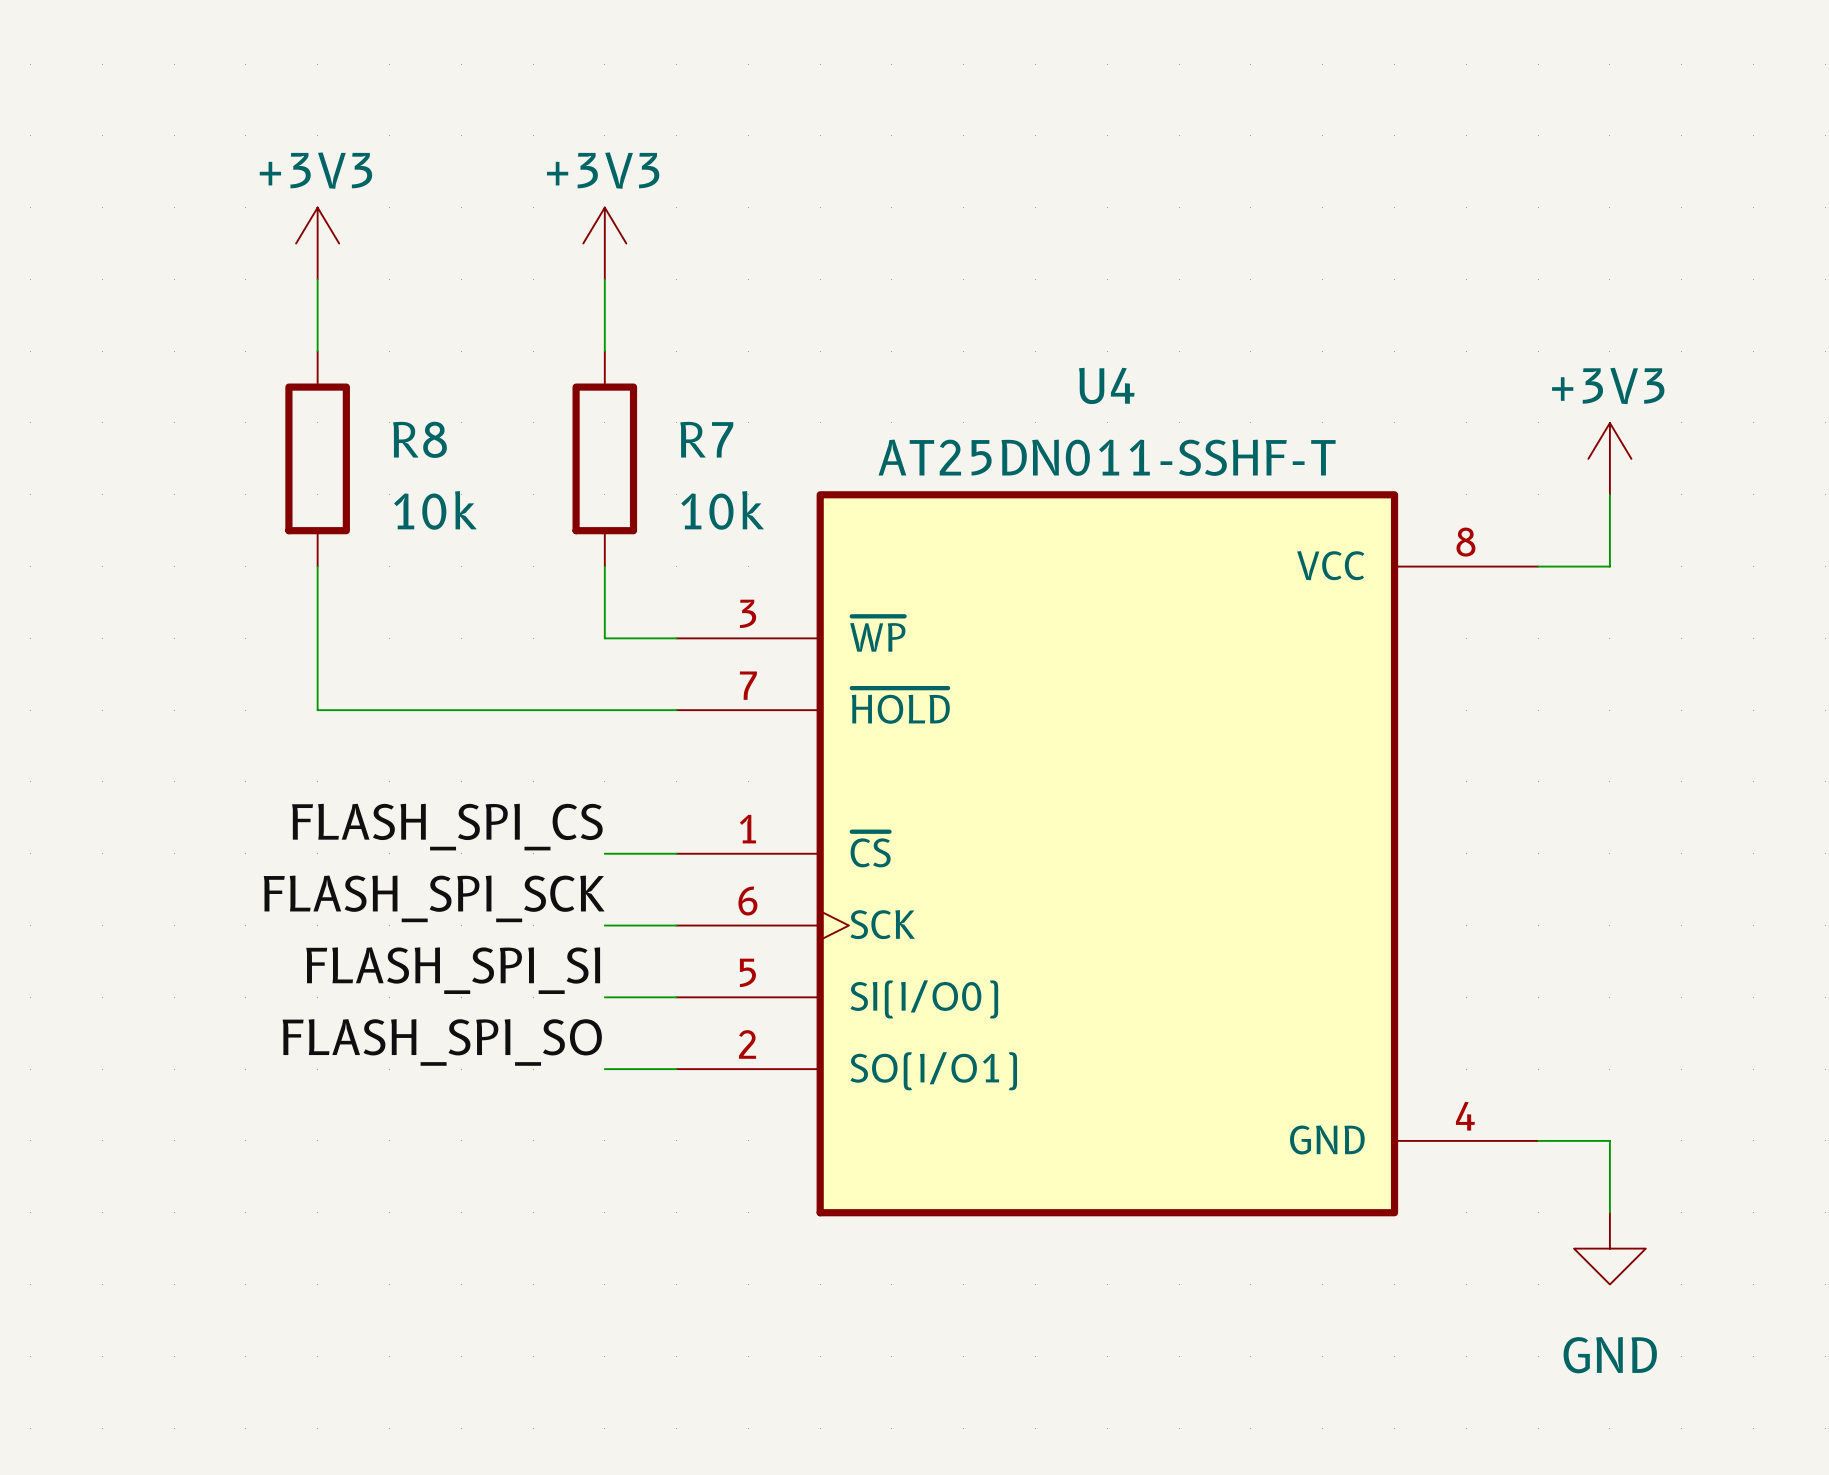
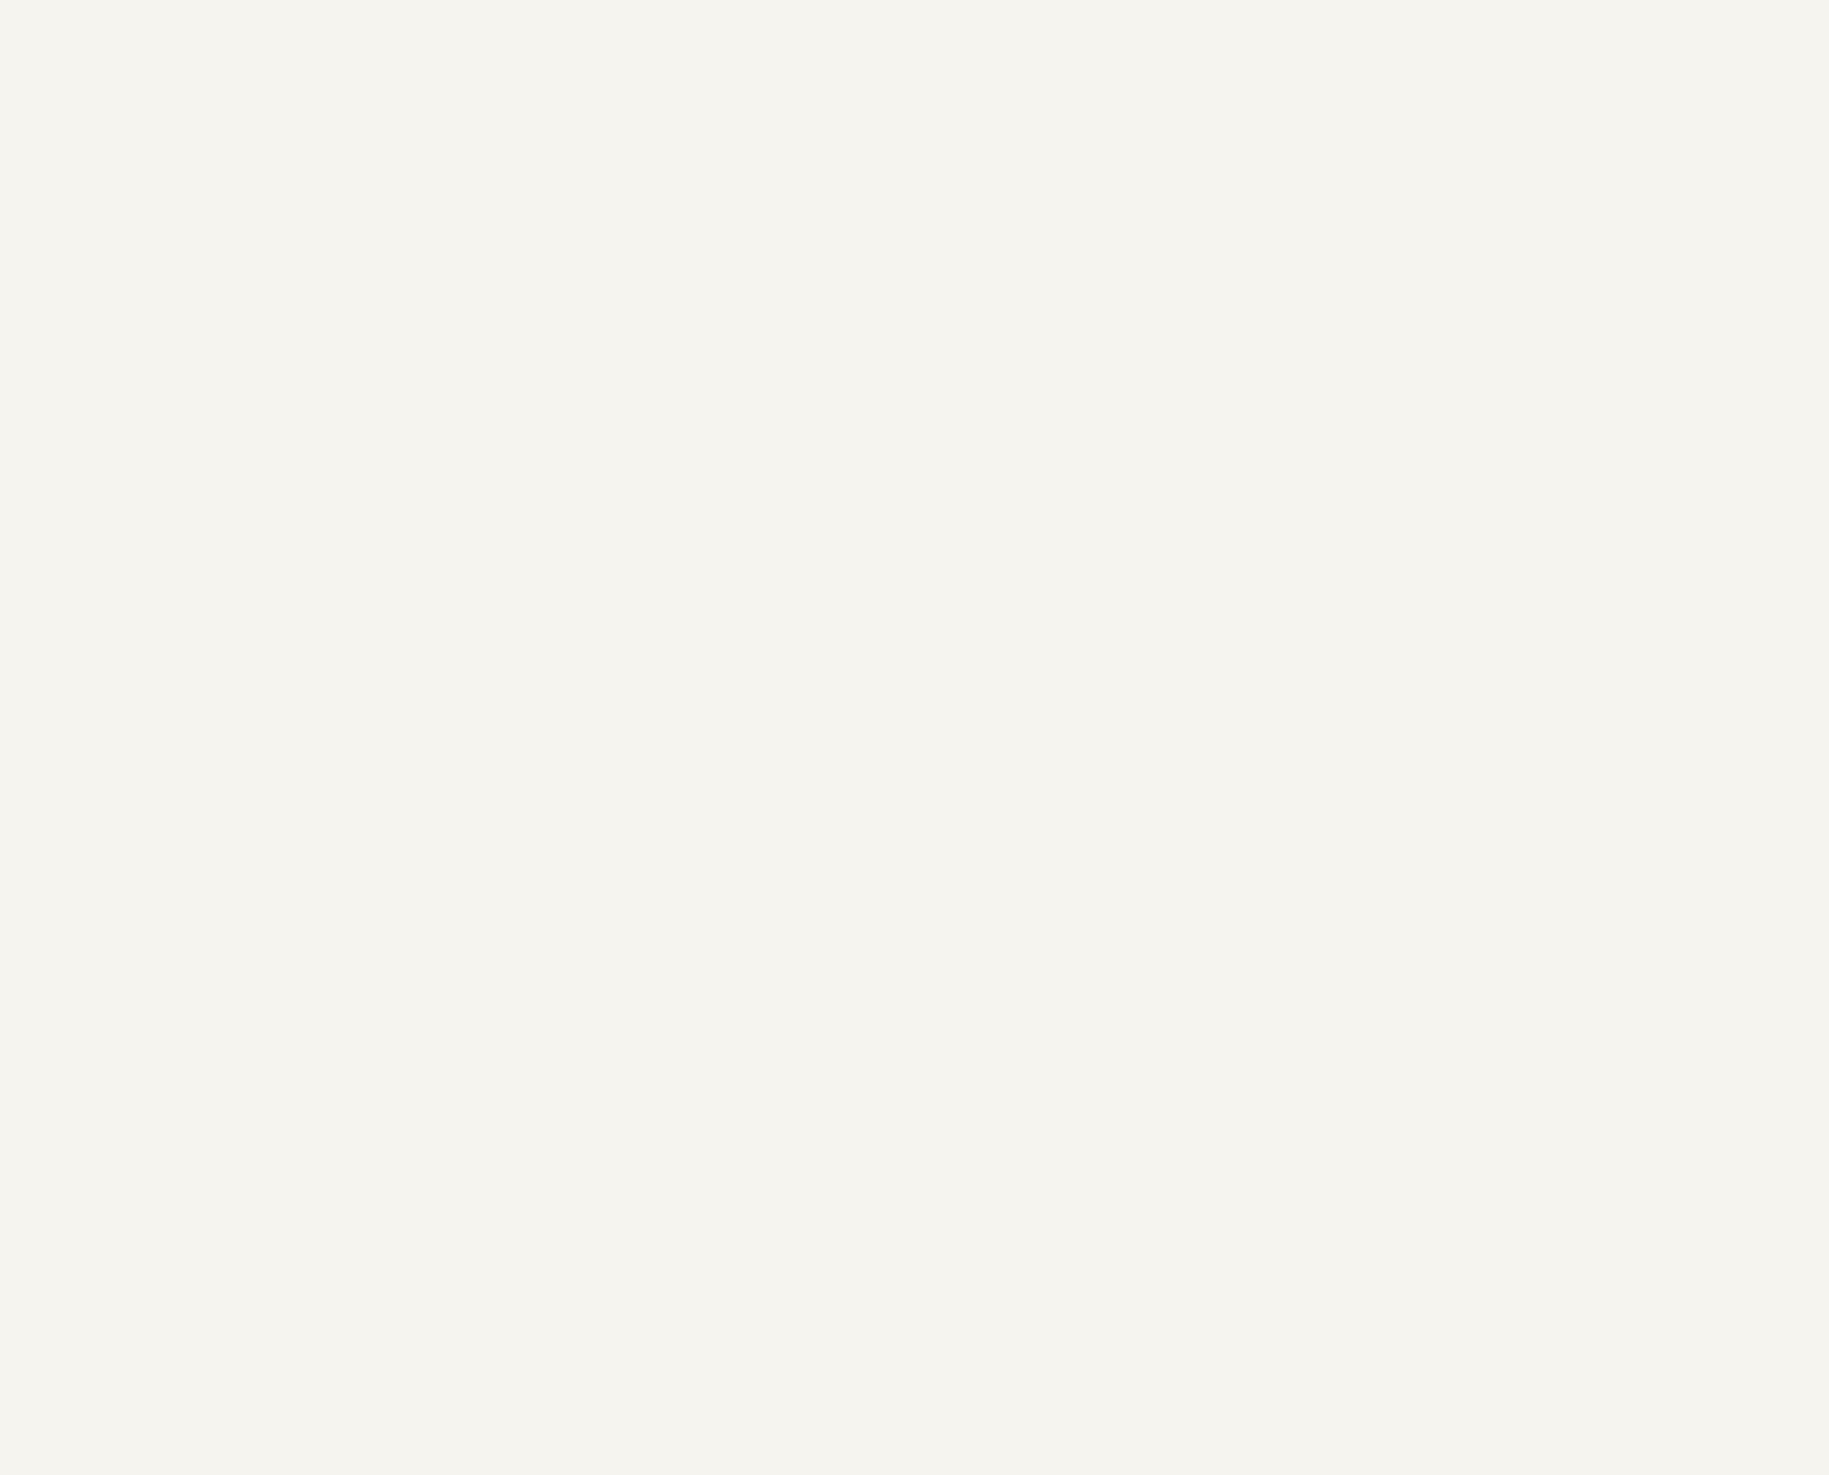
power symbol: +3V3 (317, 243) -> none
power symbol: +3V3 (604, 243) -> none
wire: (317, 279) (317, 351) -> none
wire: (604, 279) (604, 351) -> none
R8: 10k (317, 458) -> none
R7: 10k (604, 458) -> none
power symbol: +3V3 (1609, 458) -> none
wire: (1609, 494) (1609, 566) (1538, 566) -> none
wire: (317, 566) (317, 710) (676, 710) -> none
wire: (604, 566) (604, 638) (676, 638) -> none
label: FLASH_SPI_CS (447, 827) -> none
wire: (604, 853) (676, 853) -> none
U4: AT25DN011-SSHF-T (1107, 853) -> none
label: FLASH_SPI_SCK (434, 898) -> none
wire: (604, 925) (676, 925) -> none
label: FLASH_SPI_SI (453, 970) -> none
wire: (604, 997) (676, 997) -> none
label: FLASH_SPI_SO (442, 1042) -> none
wire: (604, 1069) (676, 1069) -> none
wire: (1538, 1140) (1609, 1140) (1609, 1212) -> none
power symbol: GND (1609, 1248) -> none

